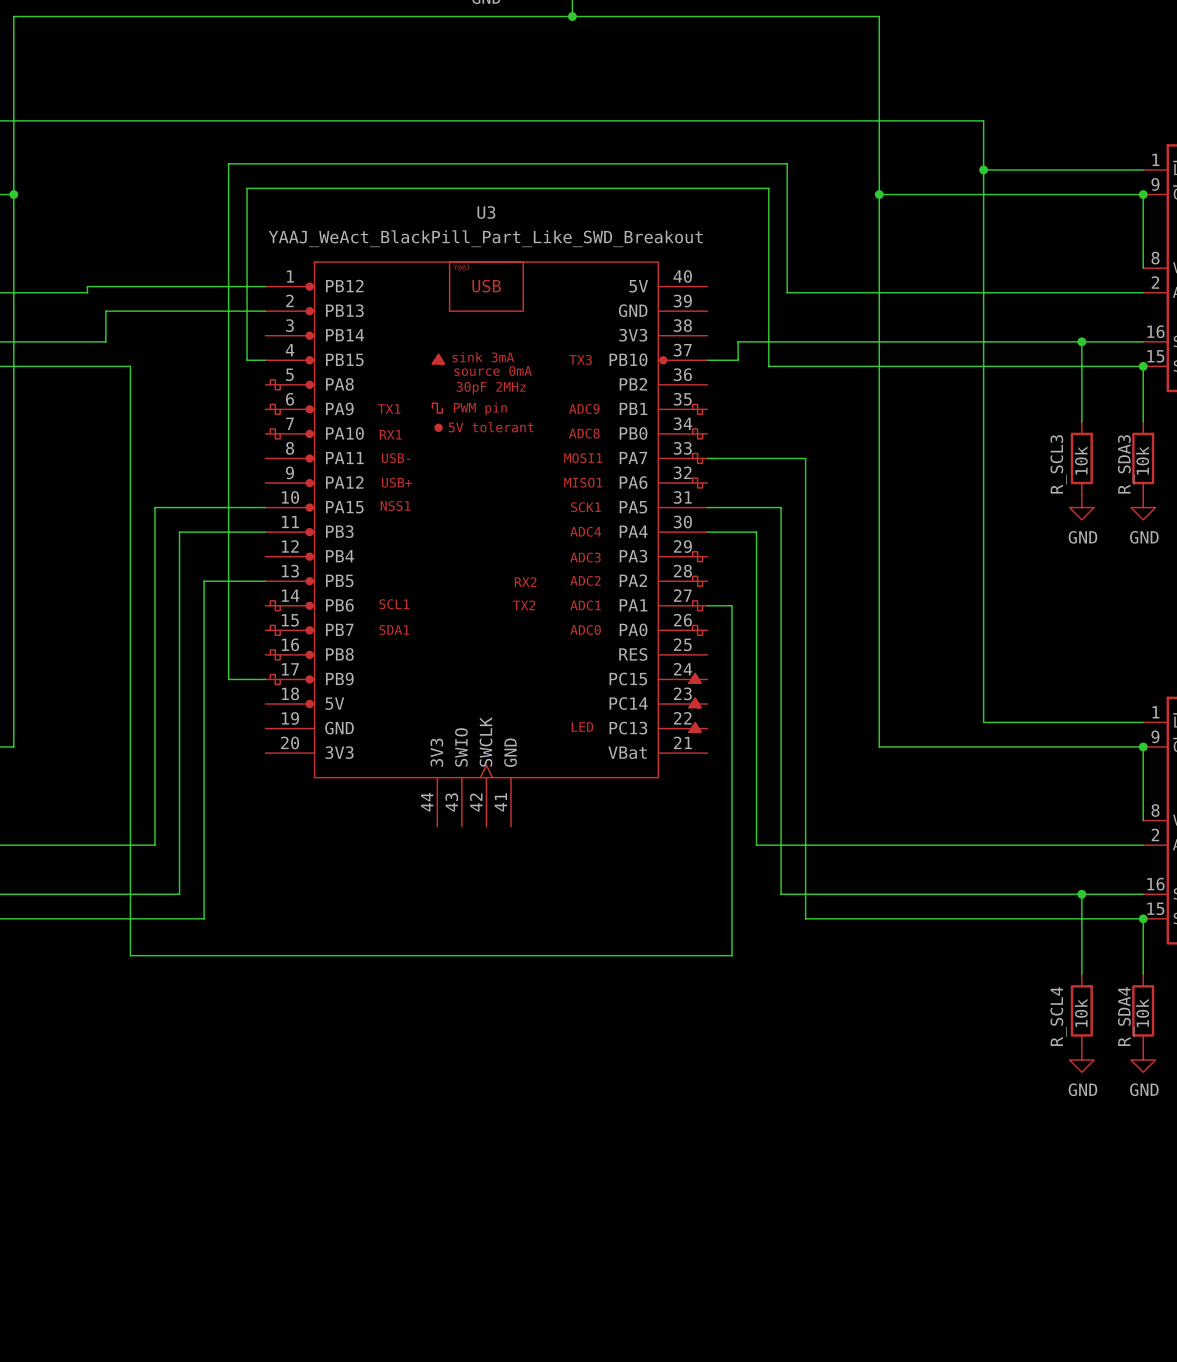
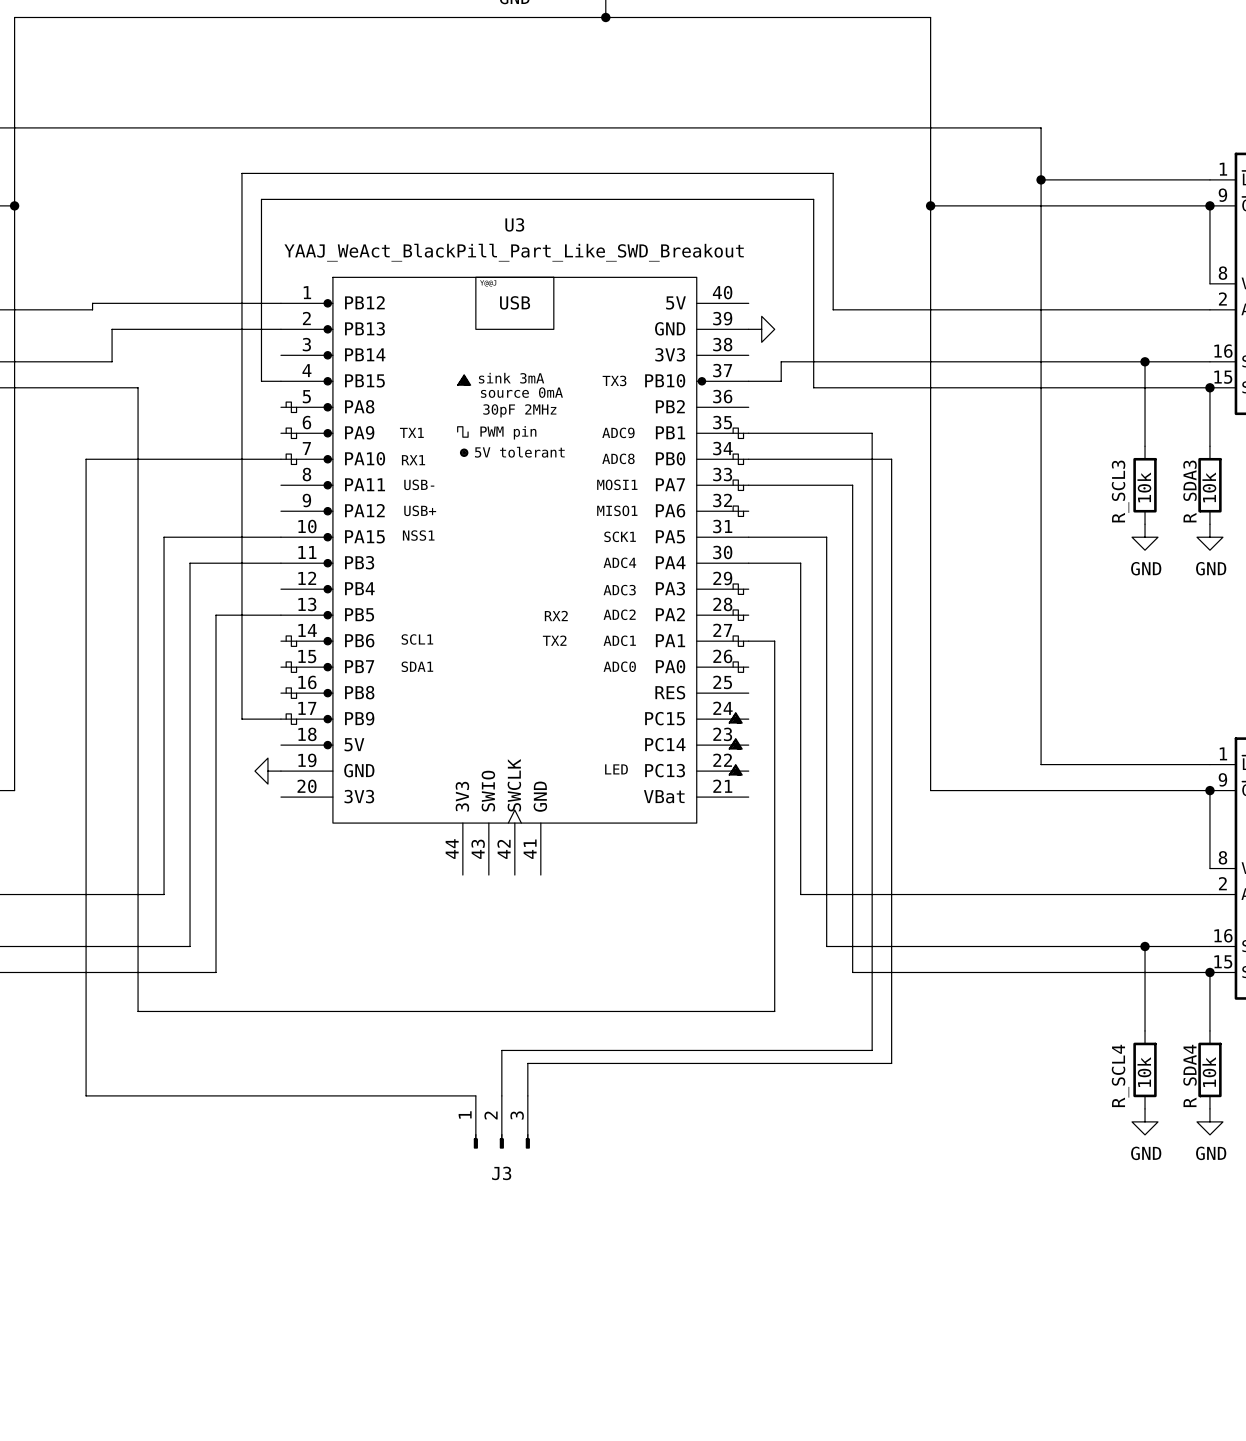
power symbol: none -> (761, 329)
wire: none -> (748, 433) (872, 433) (872, 1050) (501, 1050) (501, 1095)
wire: none -> (280, 459) (86, 459) (86, 1095) (475, 1095)
wire: none -> (748, 459) (891, 459) (891, 1063) (527, 1063) (527, 1095)
power symbol: none -> (267, 771)
J3: none -> (501, 1122)

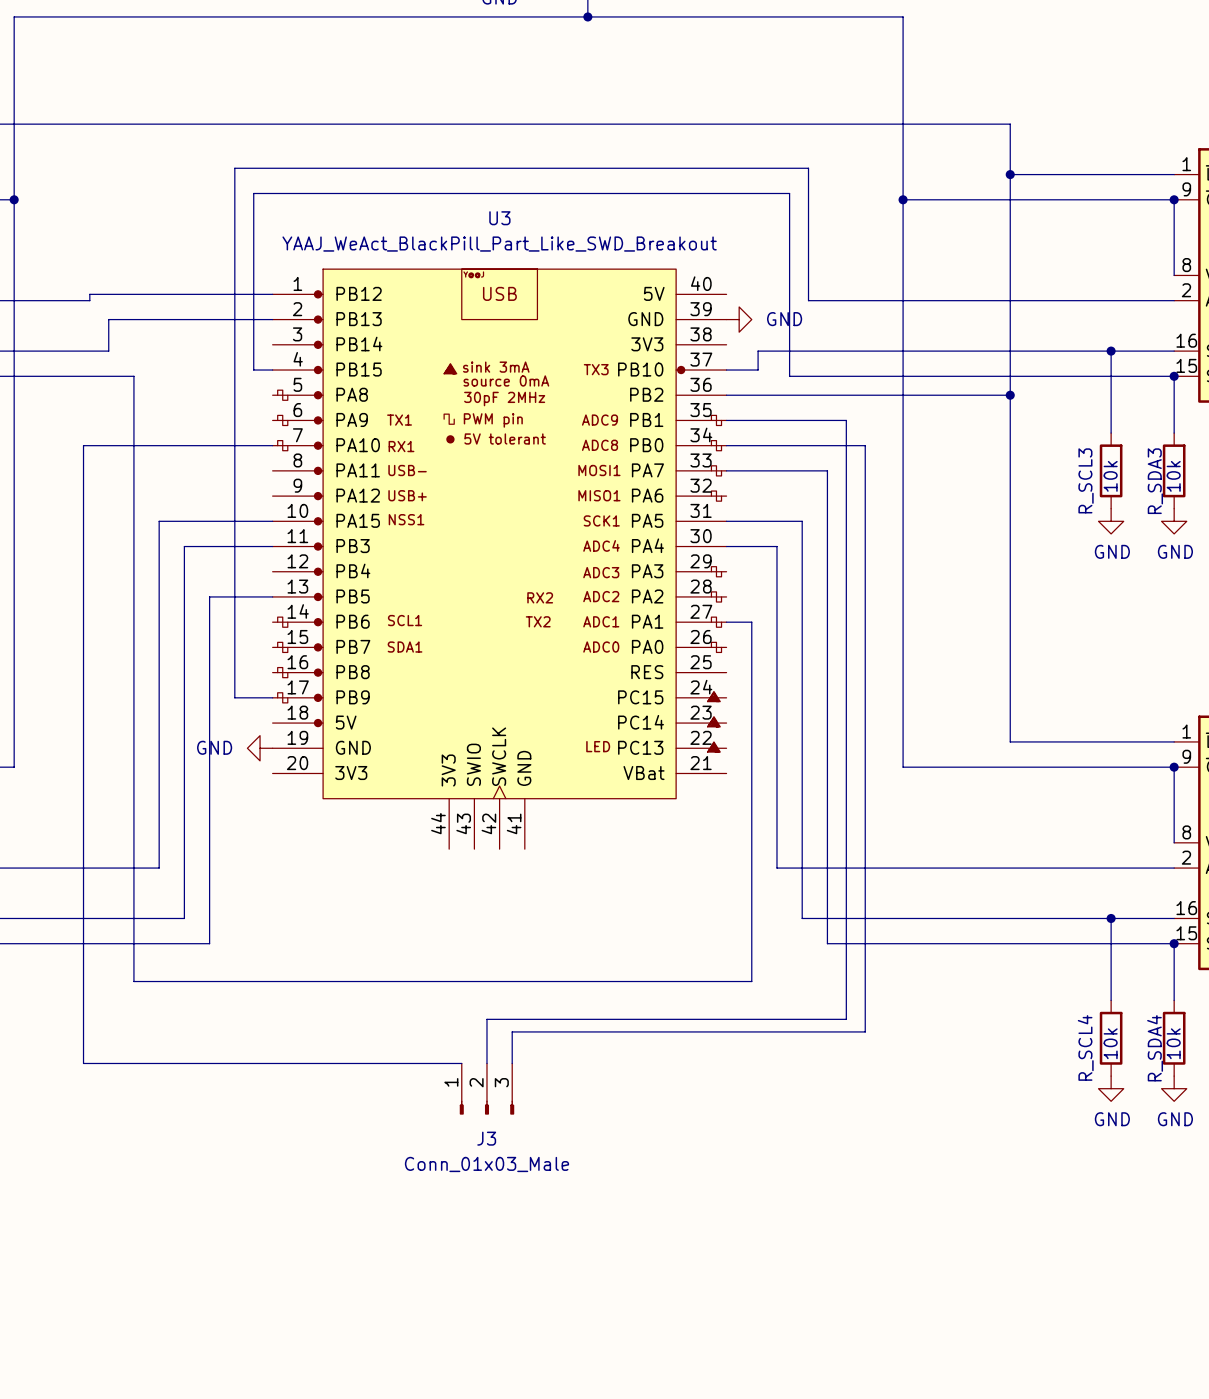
power symbol text: none -> GND (784, 319)
wire: none -> (726, 395) (1010, 395)
junction: none -> (1010, 395)
power symbol text: none -> GND (214, 747)
J3 value: none -> Conn_01x03_Male (486, 1164)

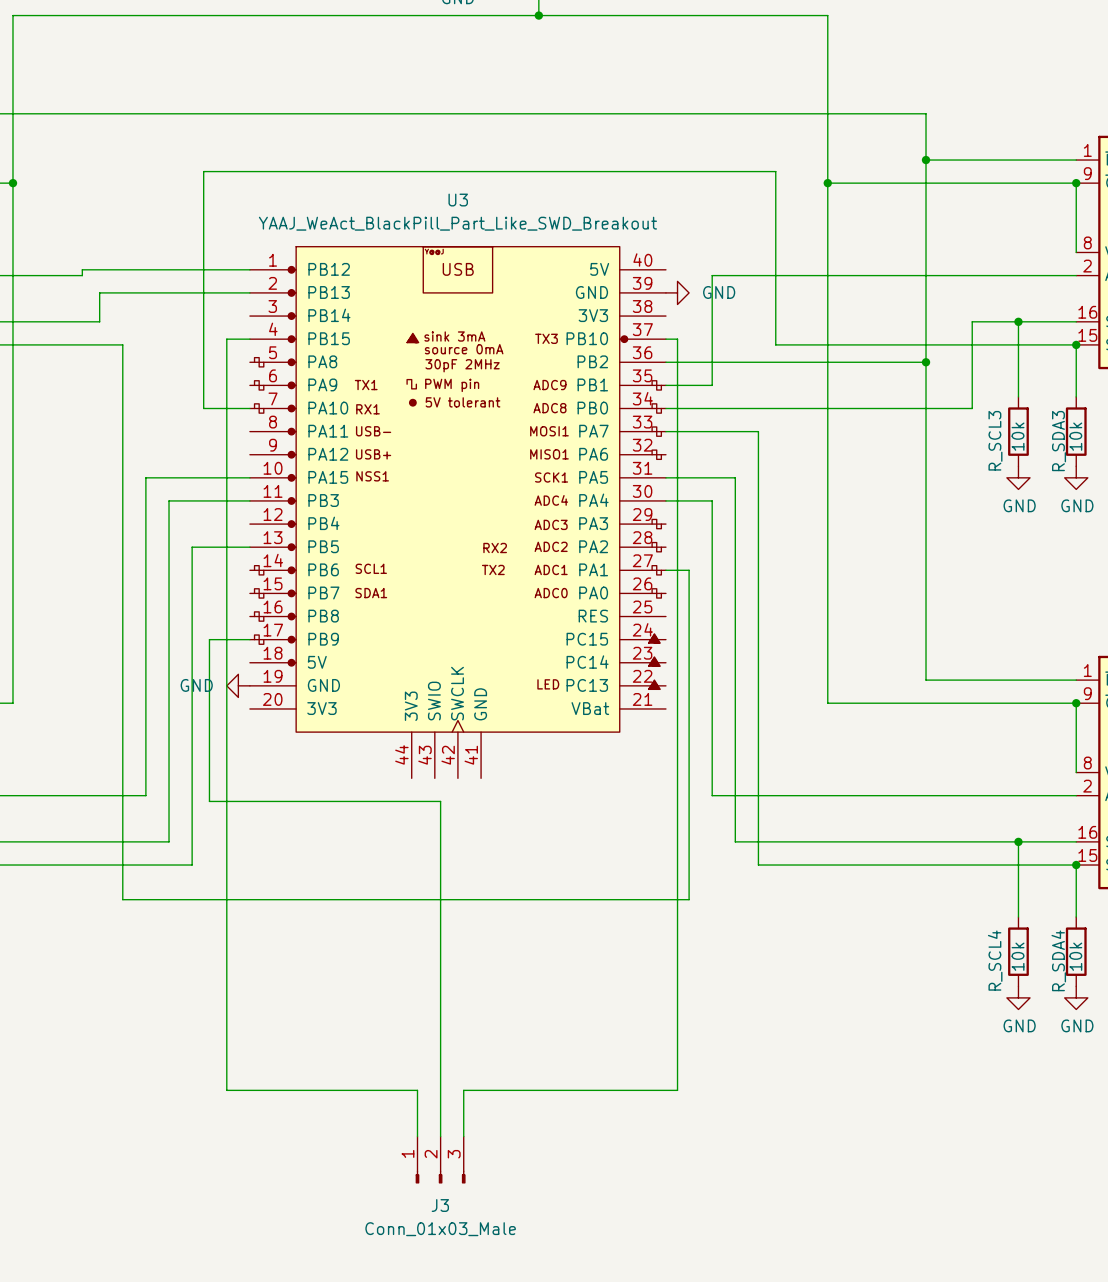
wire: (808, 300) (808, 168) (234, 168) (234, 697) -> (741, 275) (712, 275) (712, 385)
wire: (1060, 351) (758, 351) (758, 370) (739, 370) -> (972, 321) (972, 408) (793, 408)
wire: (253, 370) (253, 193) (789, 193) (789, 376) (846, 376) -> (203, 408) (203, 171) (775, 171) (775, 344)
wire: none -> (232, 339) (226, 339) (226, 1090) (417, 1090) (417, 1136)
wire: none -> (677, 339) (677, 1090) (463, 1090) (463, 1136)
wire: (776, 420) (846, 420) (846, 1019) (486, 1019) (486, 1063) -> none
wire: (222, 445) (83, 445) (83, 1063) (461, 1063) -> none
wire: (865, 445) (865, 1031) (512, 1031) (512, 1063) -> none
wire: none -> (215, 639) (209, 639) (209, 801) (440, 801) (440, 1136)
J3 position: (486, 1089) -> (440, 1160)

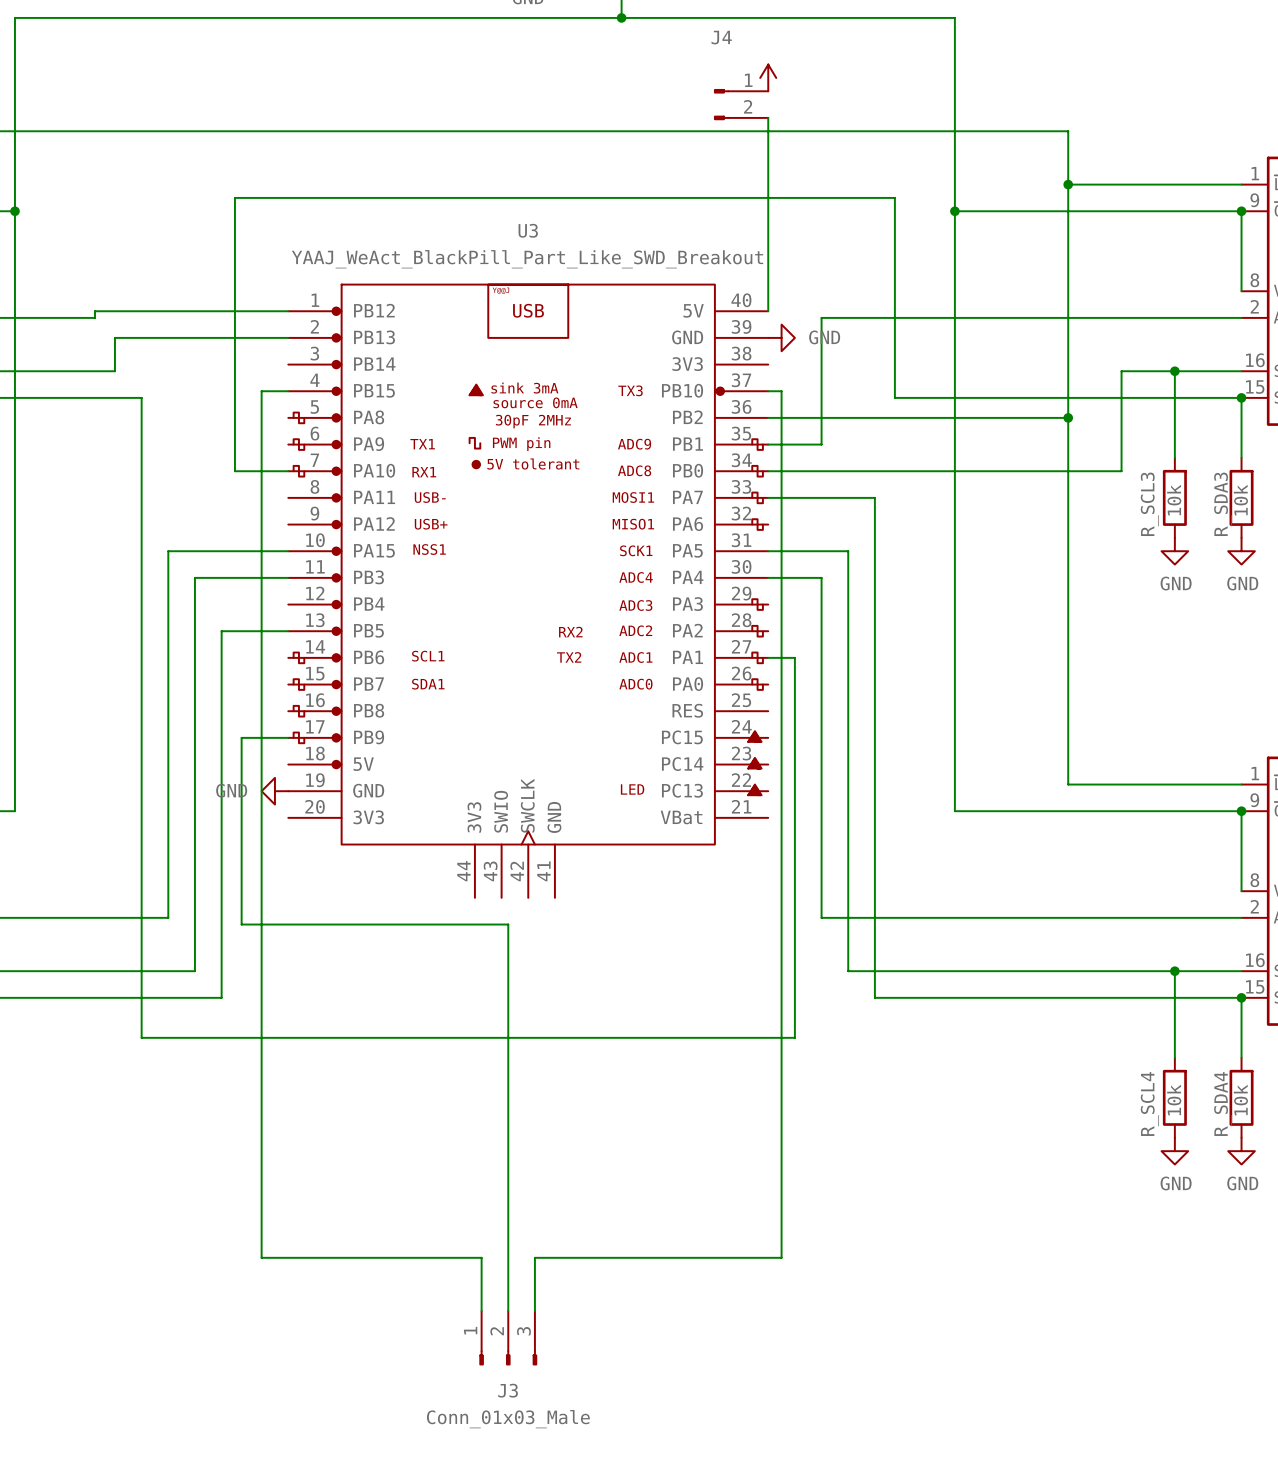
power symbol: none -> (768, 77)
J4: none -> (741, 104)
wire: none -> (768, 117) (768, 311)

